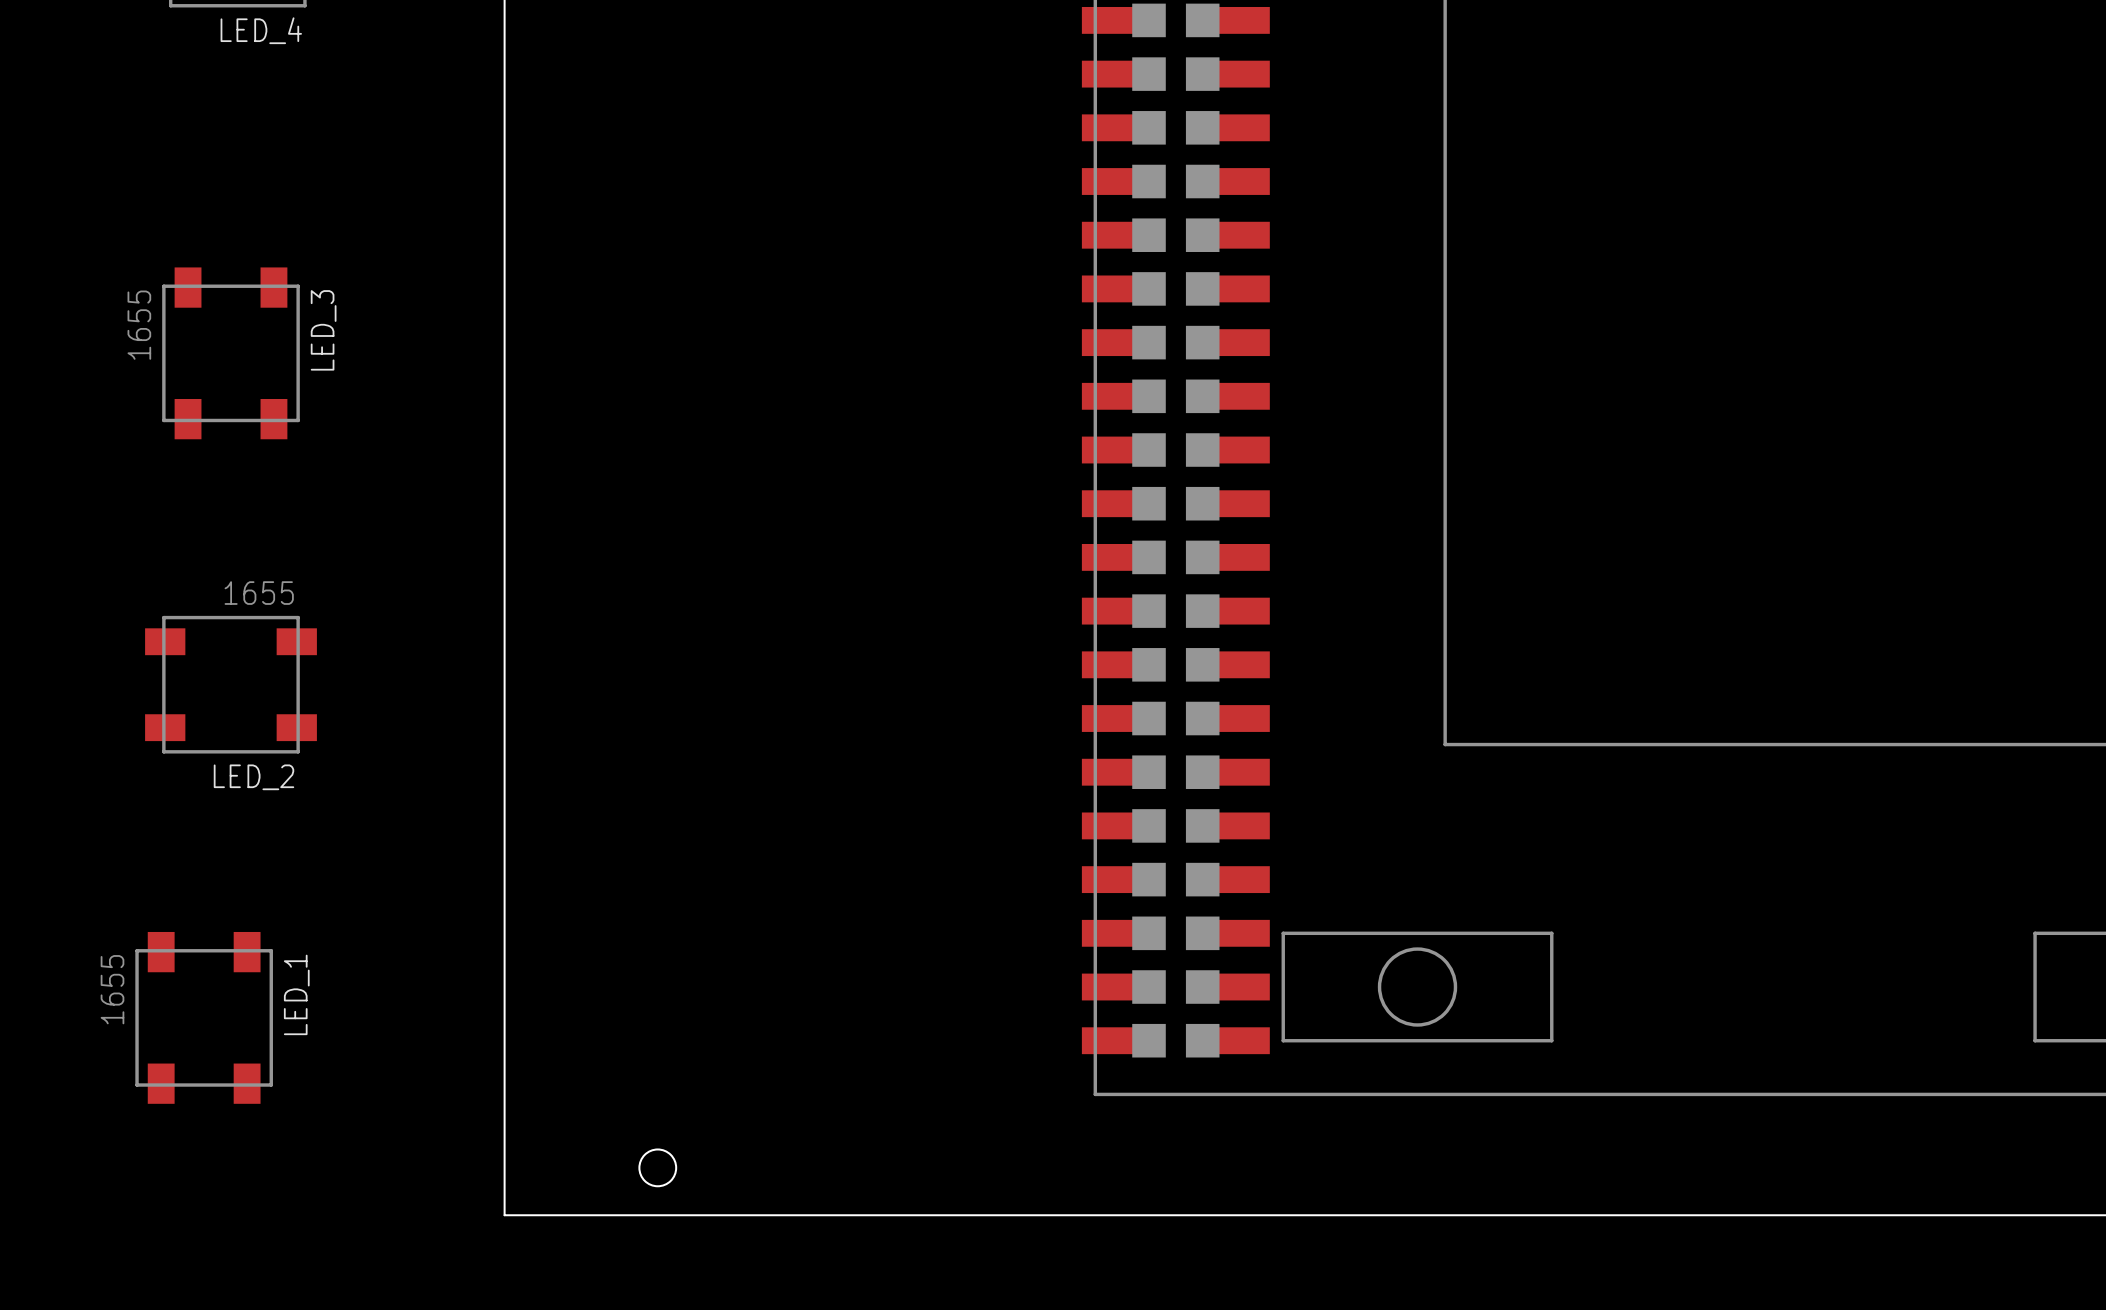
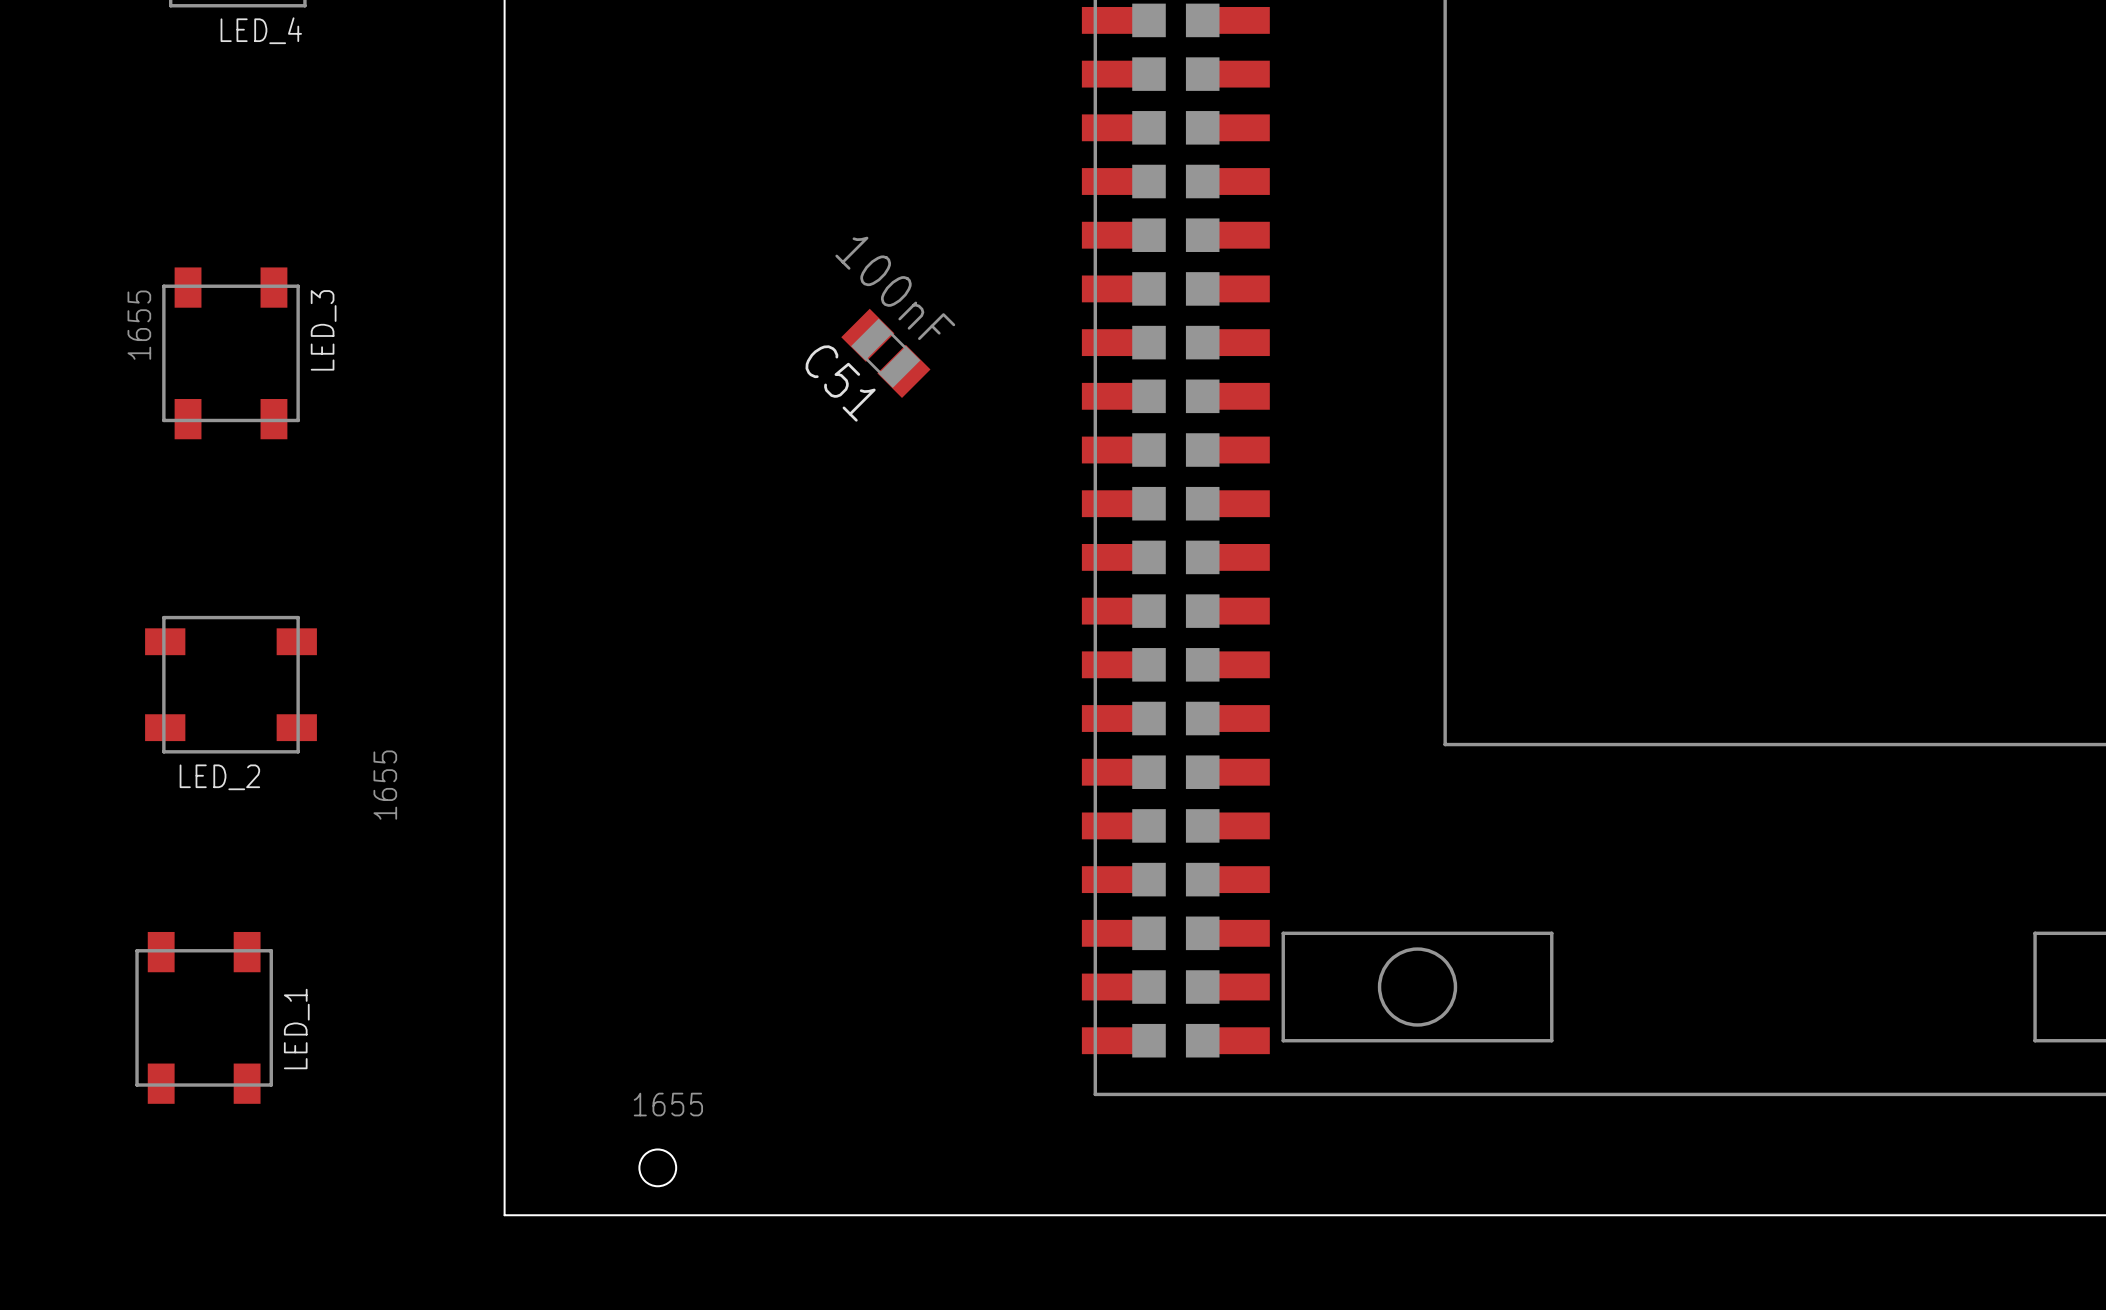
C51: none -> 100nF (885, 353)
LED_2 value position: 1655 (259, 593) -> 1655 (668, 1104)
LED_2 name position: LED_2 (253, 777) -> LED_2 (219, 777)
LED_1 value position: 1655 (112, 989) -> 1655 (385, 785)
LED_1 name position: LED_1 (296, 994) -> LED_1 (296, 1029)

